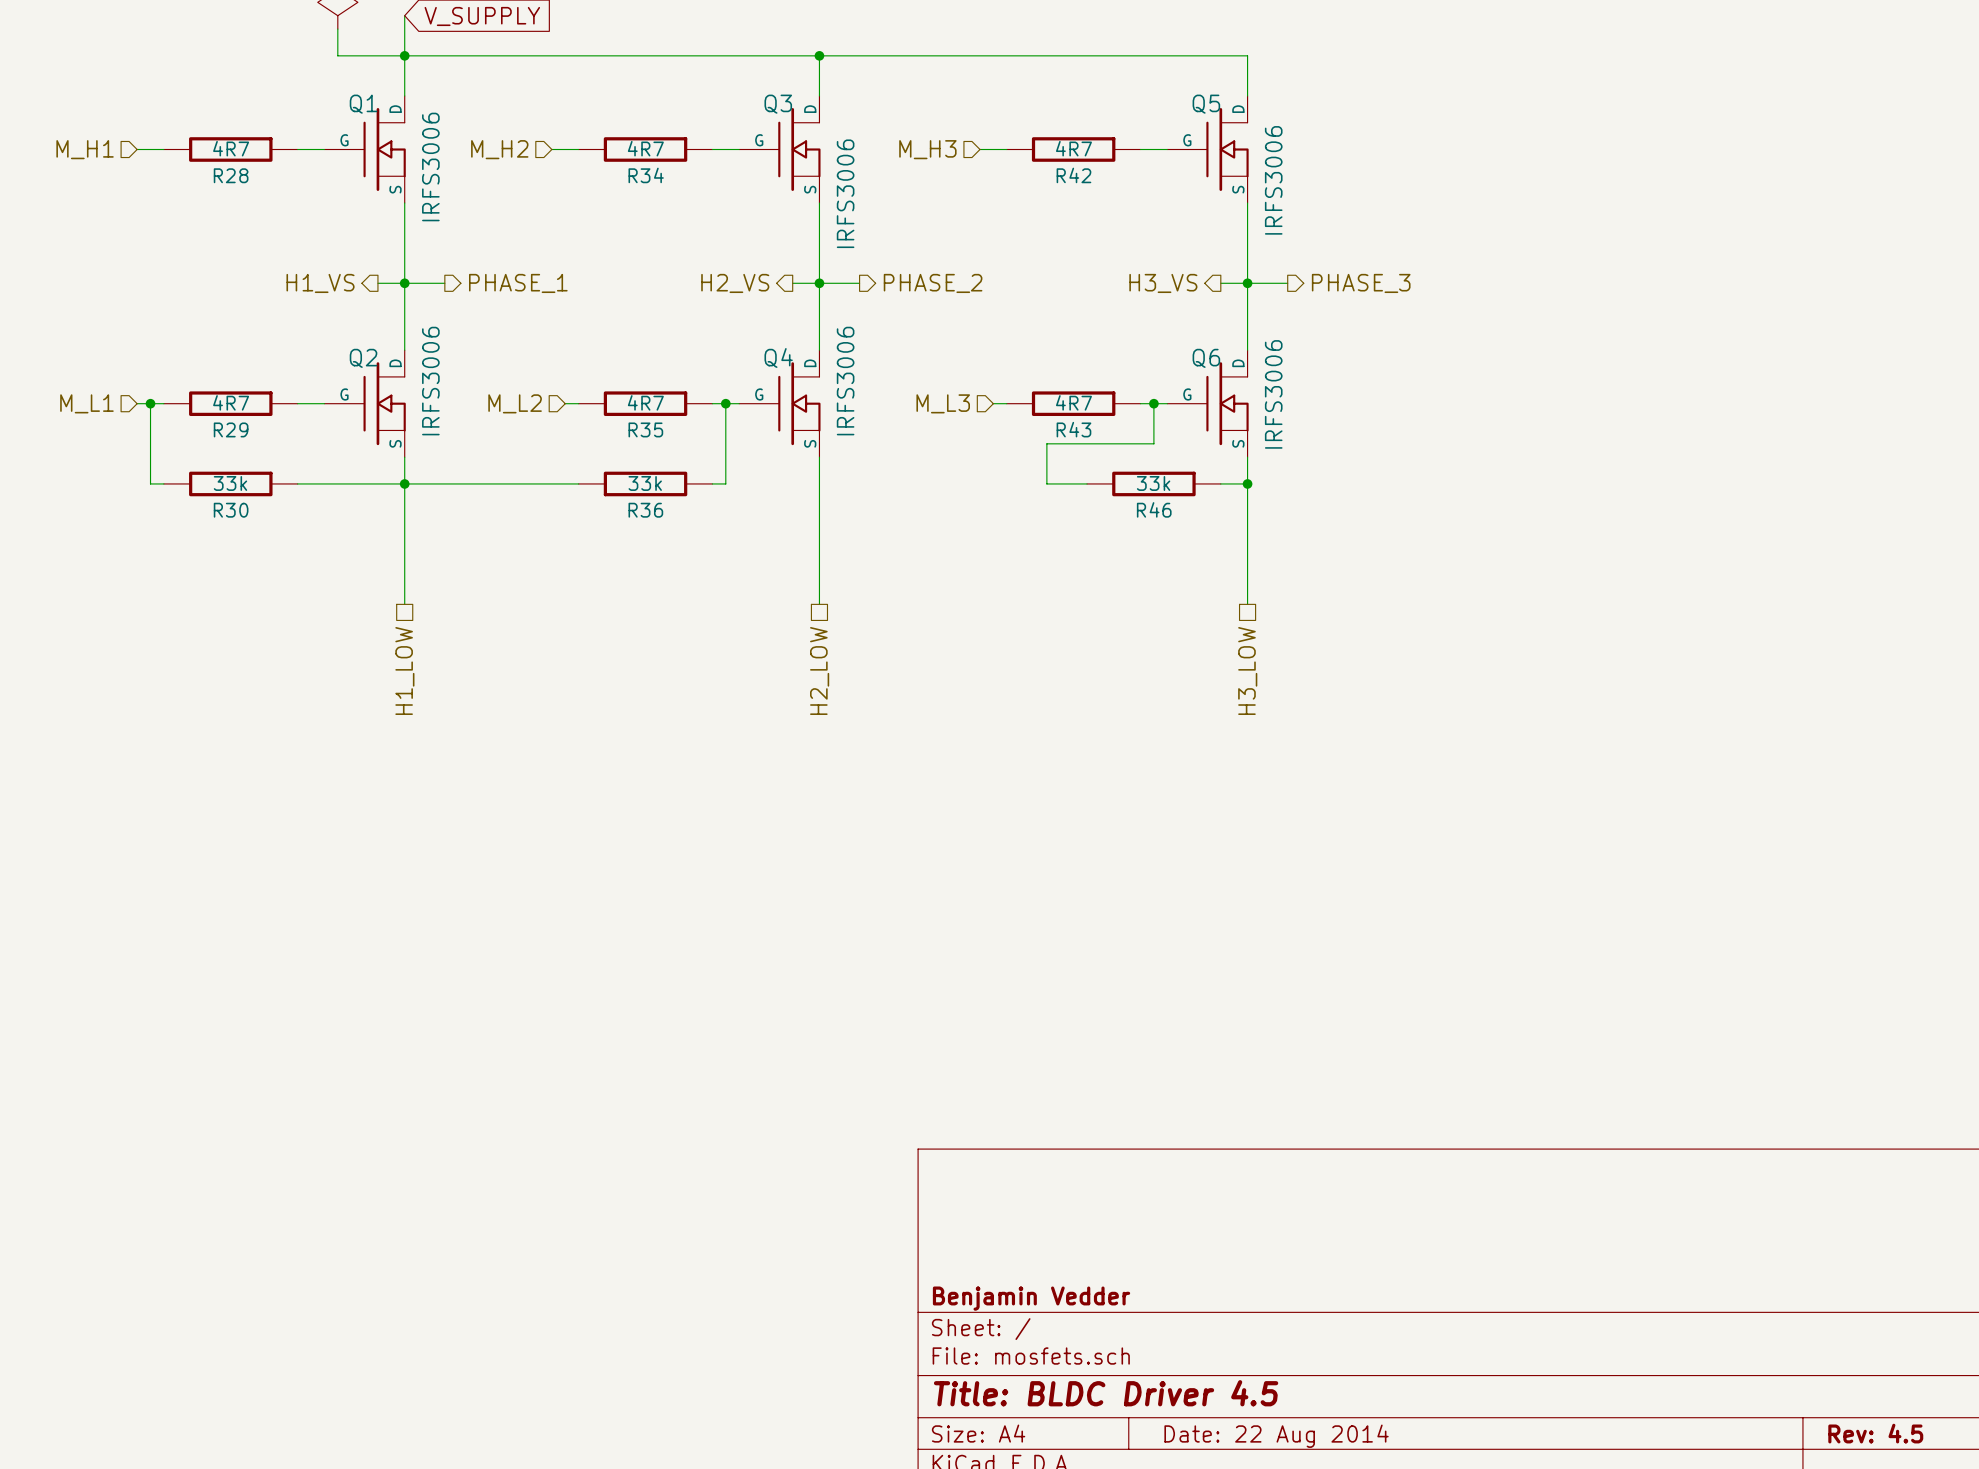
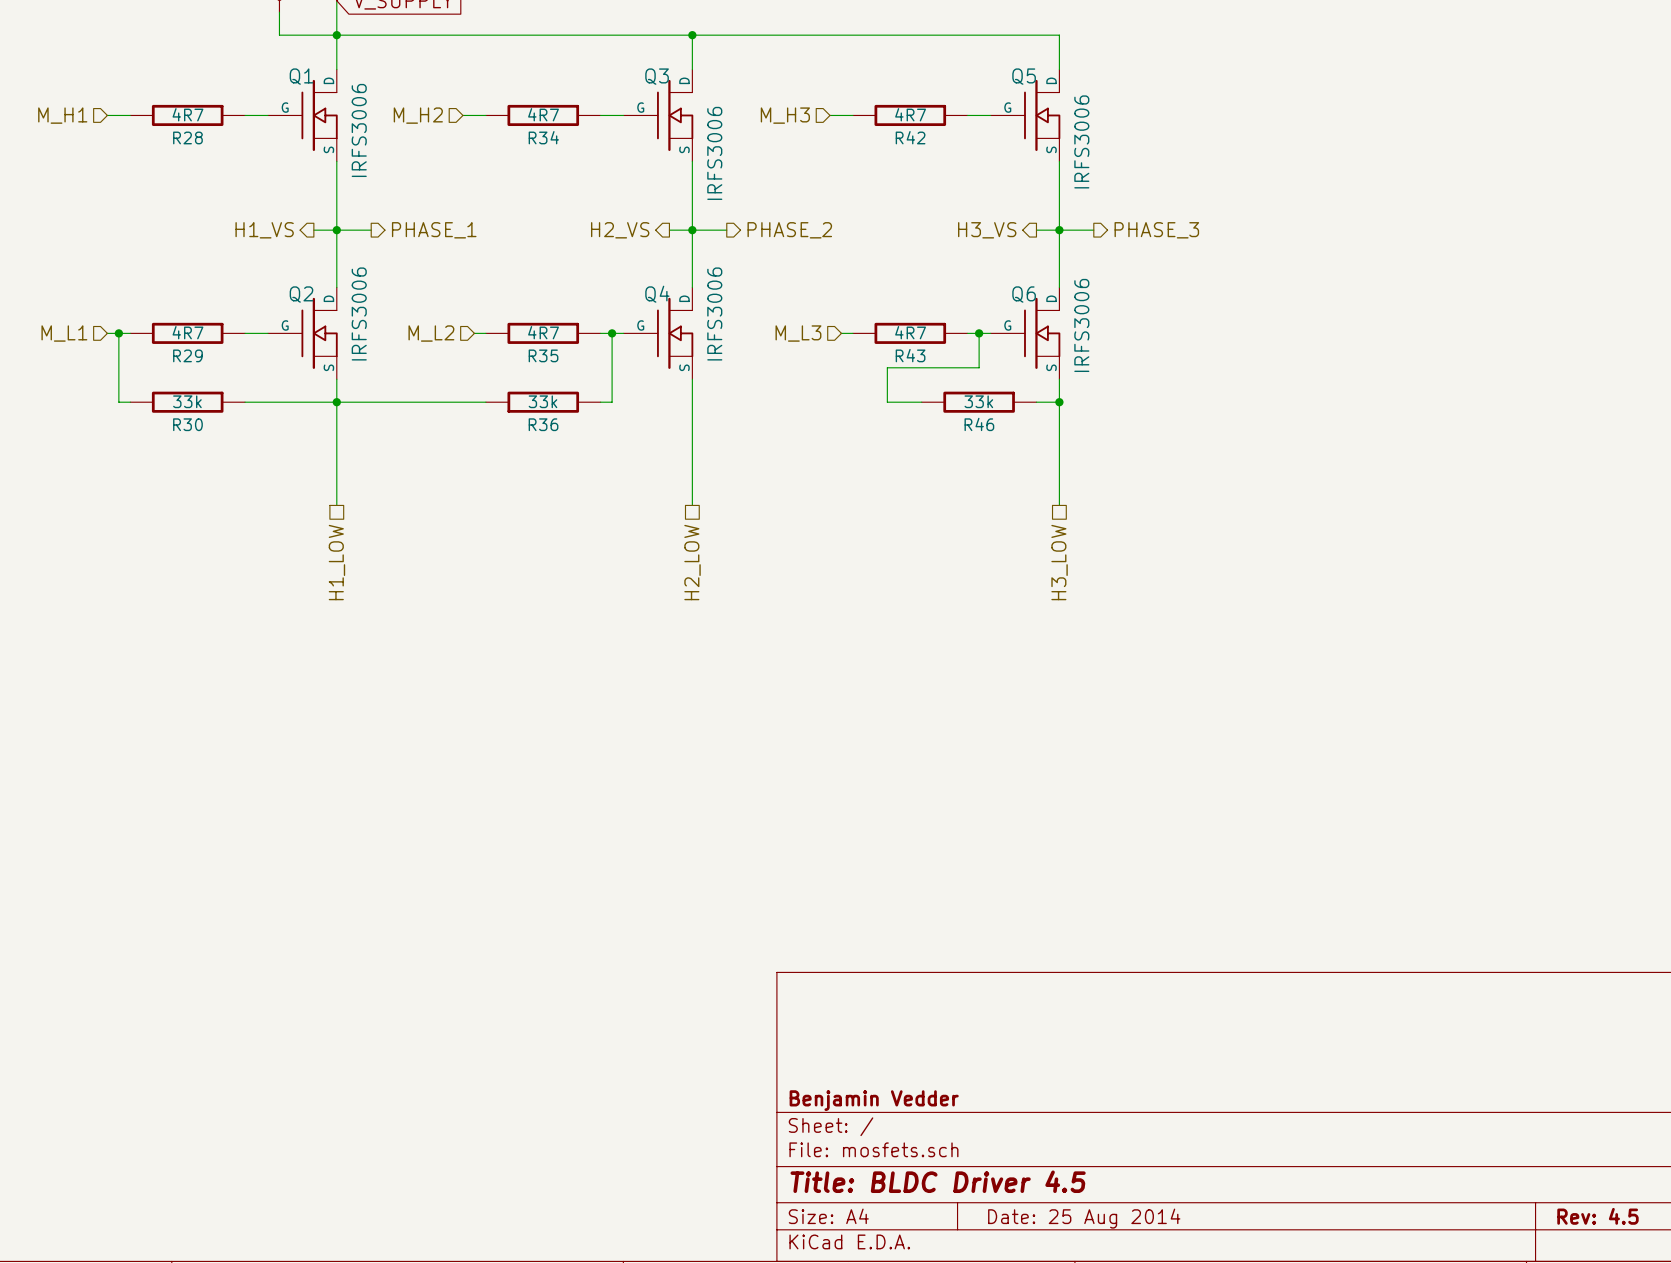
title block: Date: 22 Aug 2014 (1276, 1436) -> Date: 25 Aug 2014 (1084, 1218)

